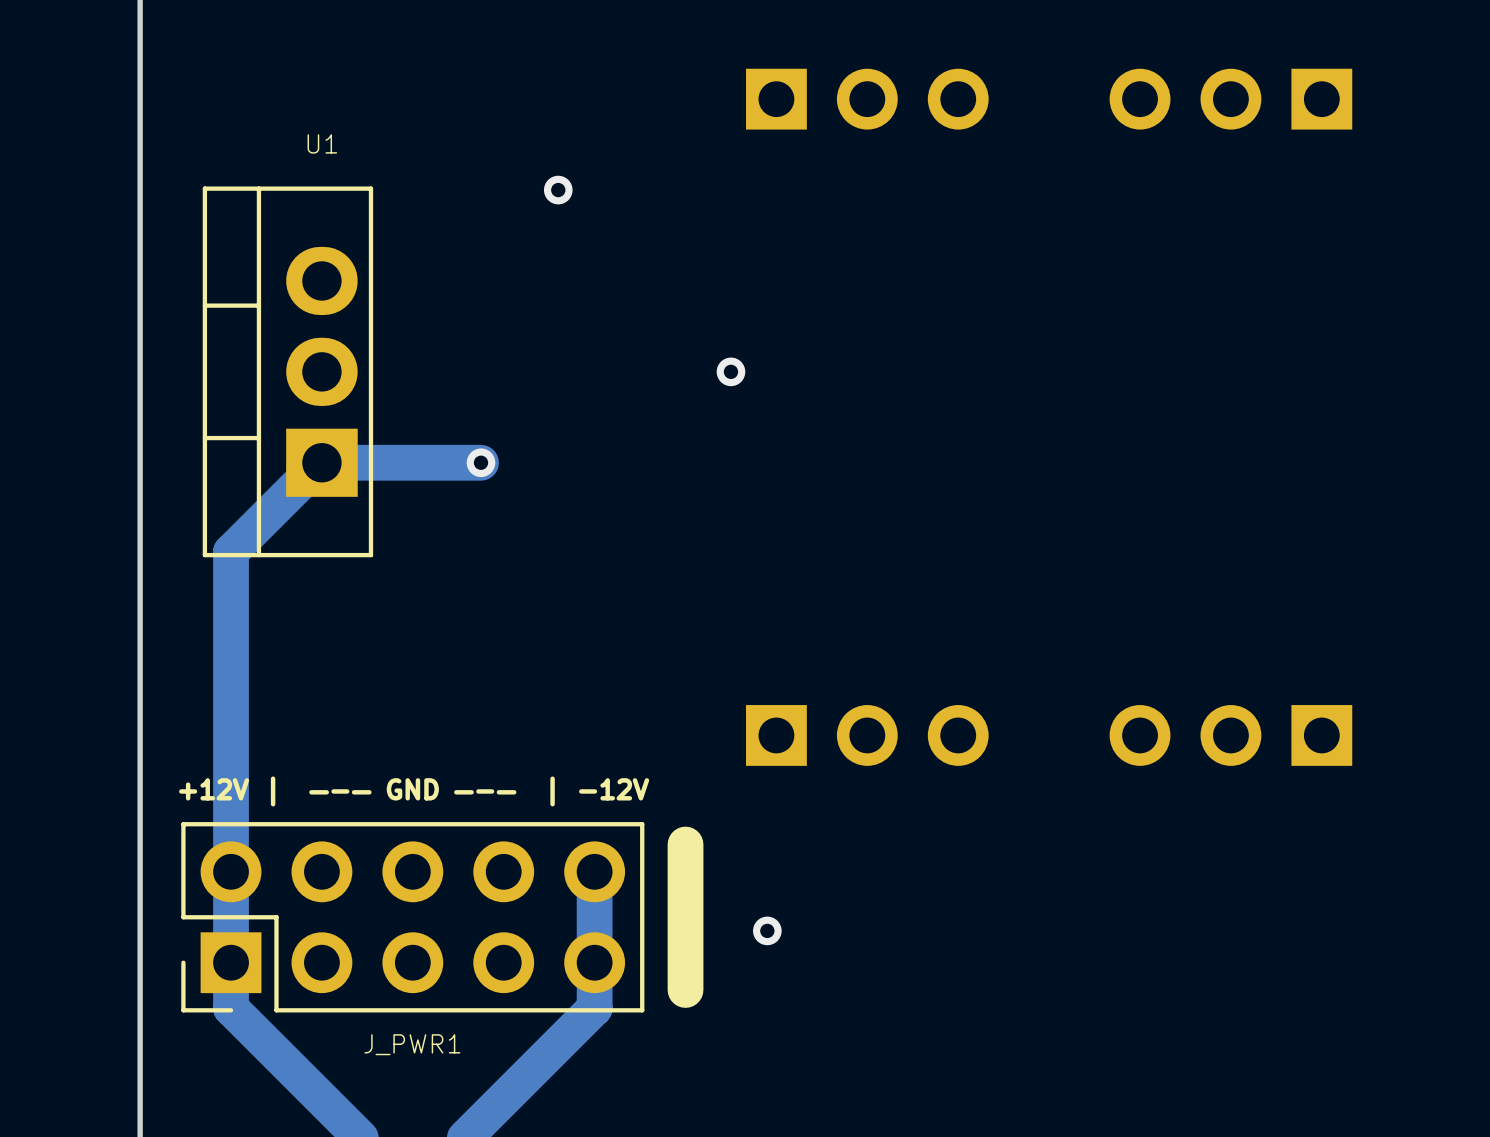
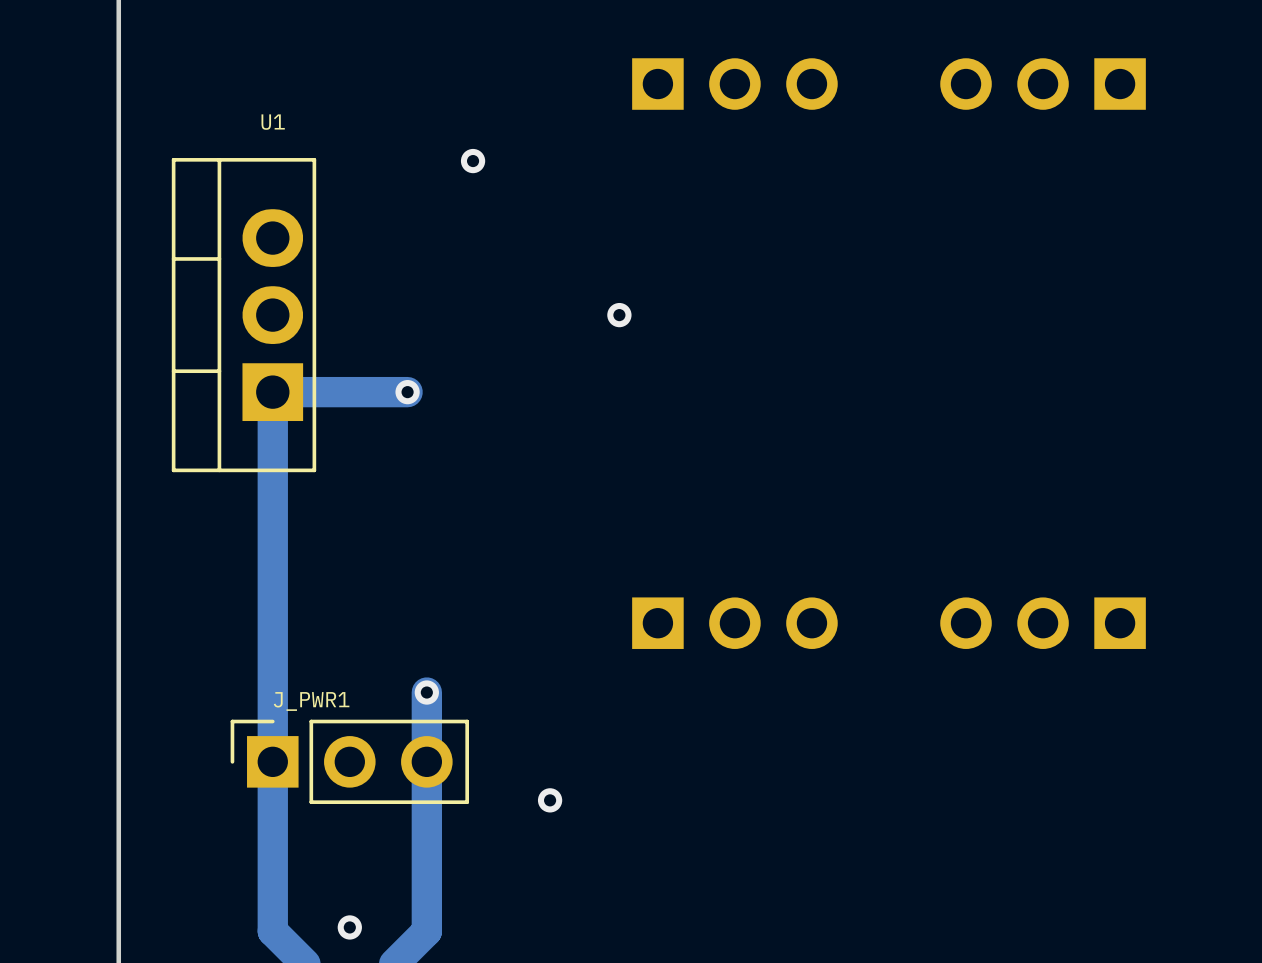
track: (321, 462) (231, 551) (231, 1008) (321, 1099) -> (272, 392) (272, 931)
text: +12V (214, 789) -> none
text: -12V (614, 789) -> none
text: | —-— GND —-— | (412, 791) -> none
via: none -> (426, 692)
J_PWR1 footprint: [181, 822, 645, 1013] -> [230, 719, 469, 805]
line: (685, 844) (685, 989) -> none
track: (594, 871) (594, 1008) (503, 1099) -> (426, 692) (426, 931)
via position: (767, 930) -> (550, 800)
J_PWR1 name position: J_PWR1 (412, 1044) -> J_PWR1 (311, 701)
via: none -> (349, 927)

